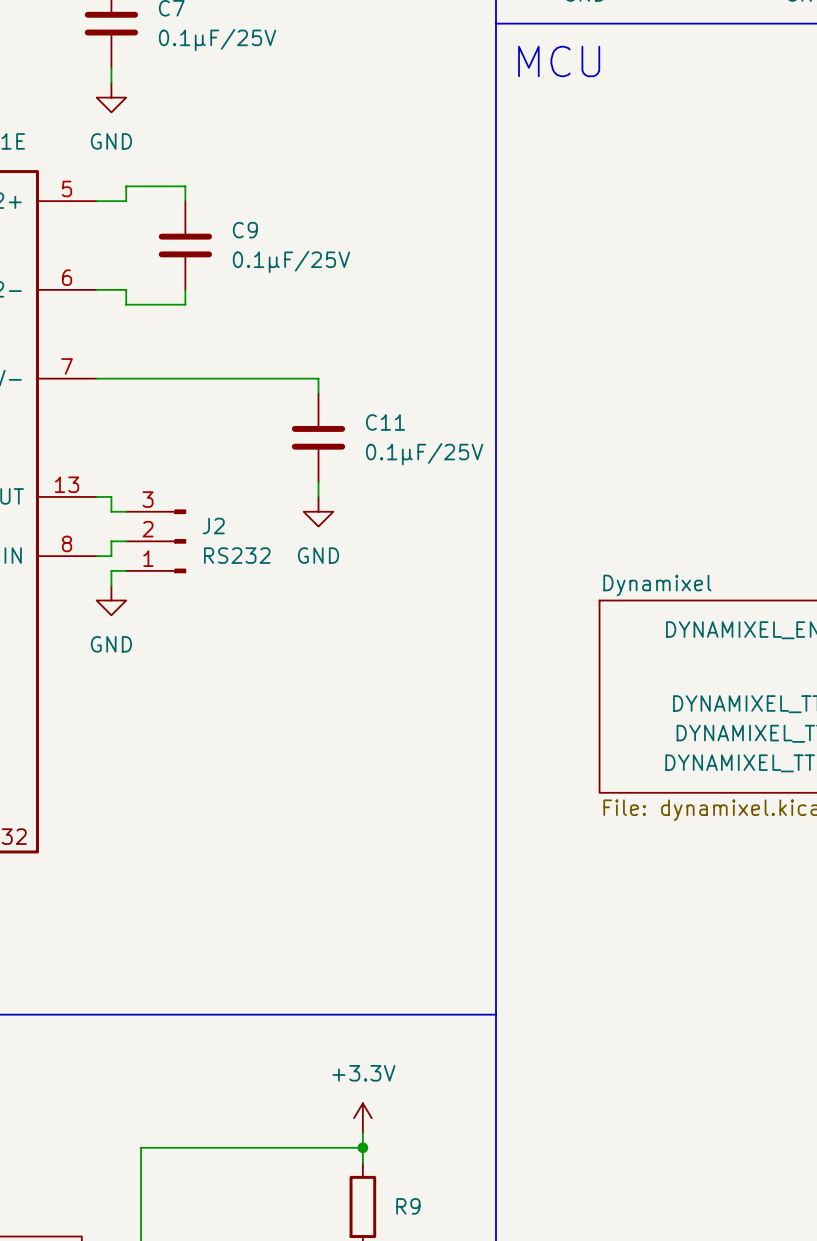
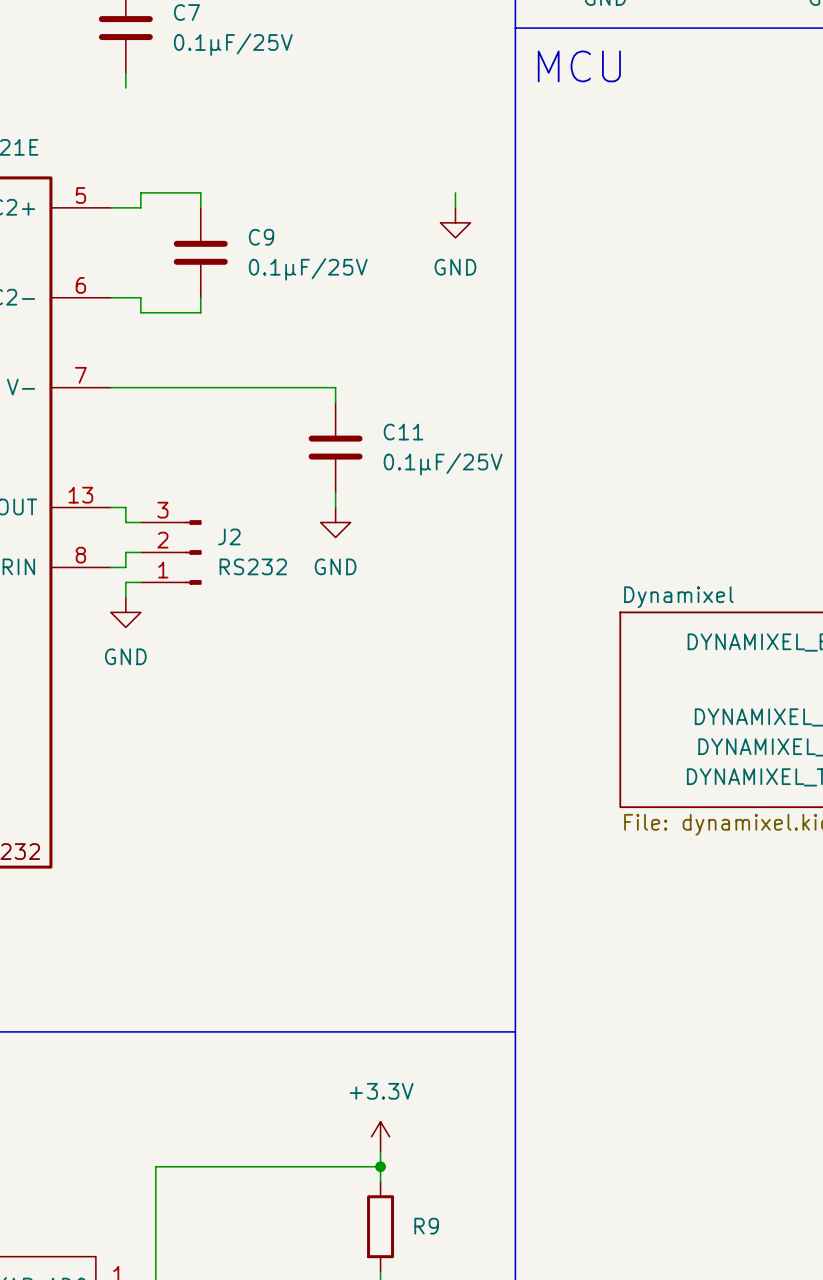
power symbol: GND (111, 97) -> none
wire: none -> (455, 192) (455, 207)
power symbol: none -> GND (455, 222)

